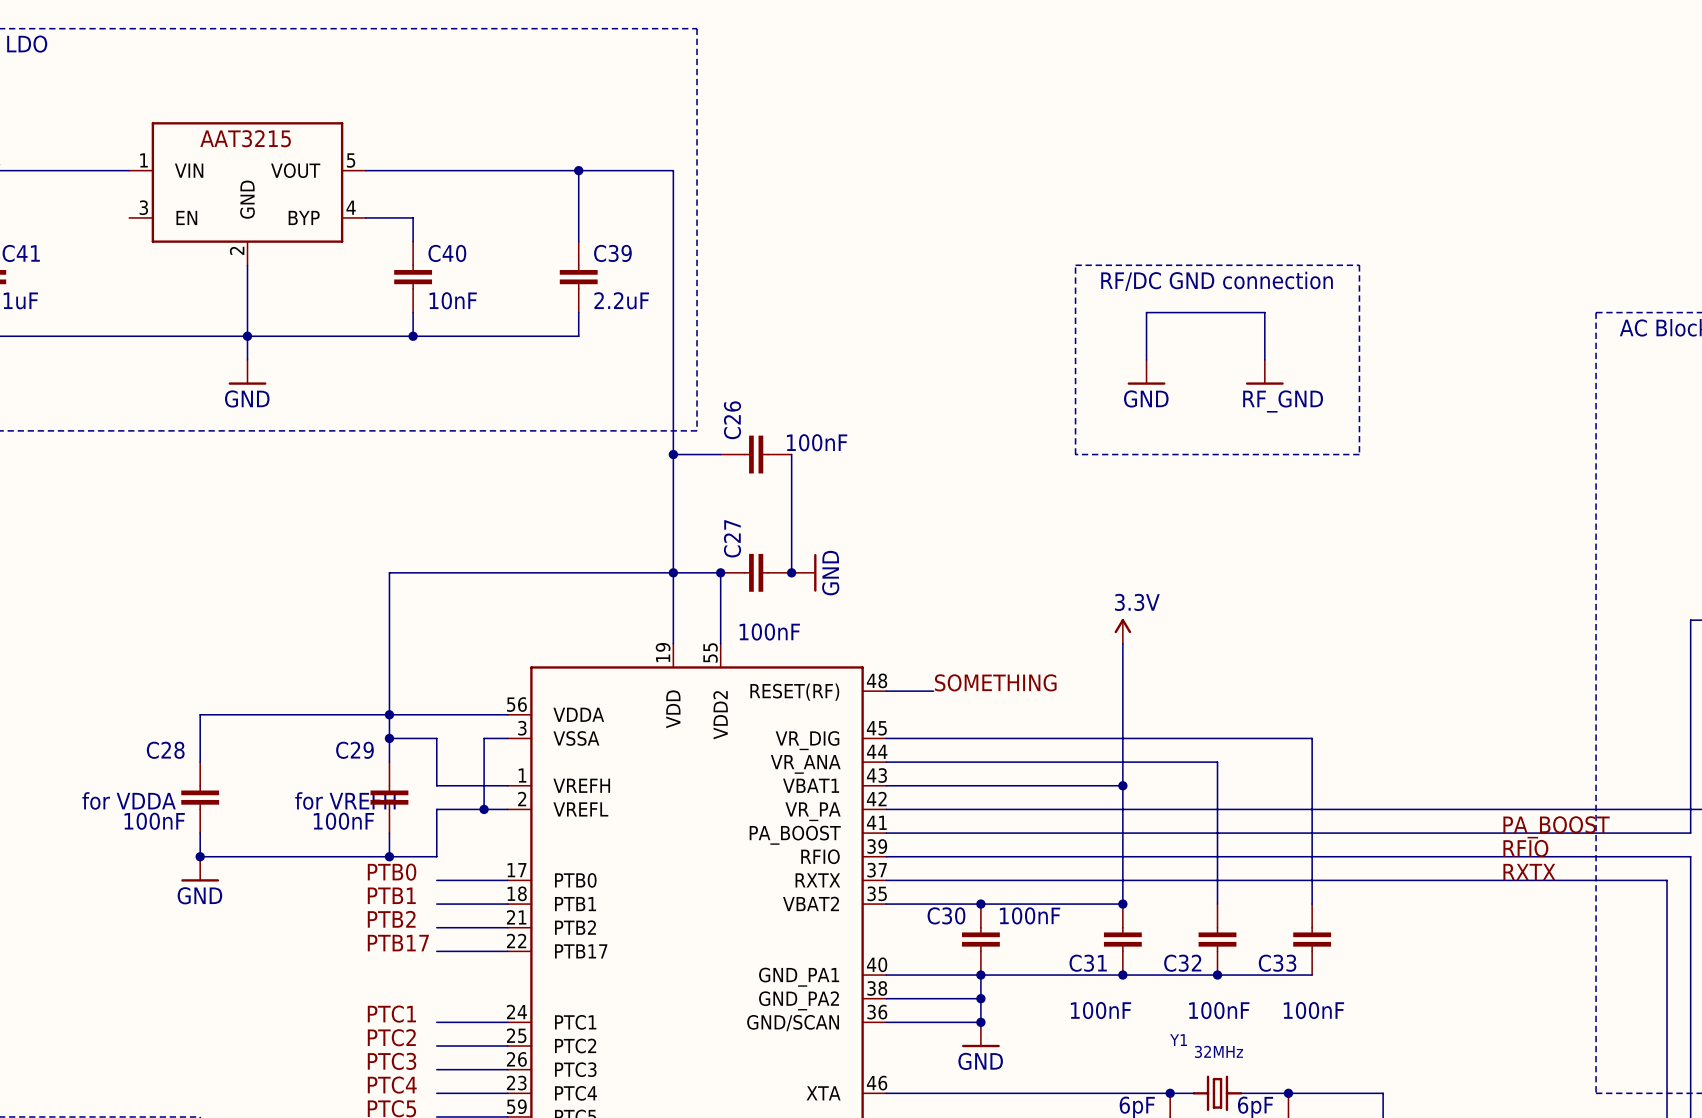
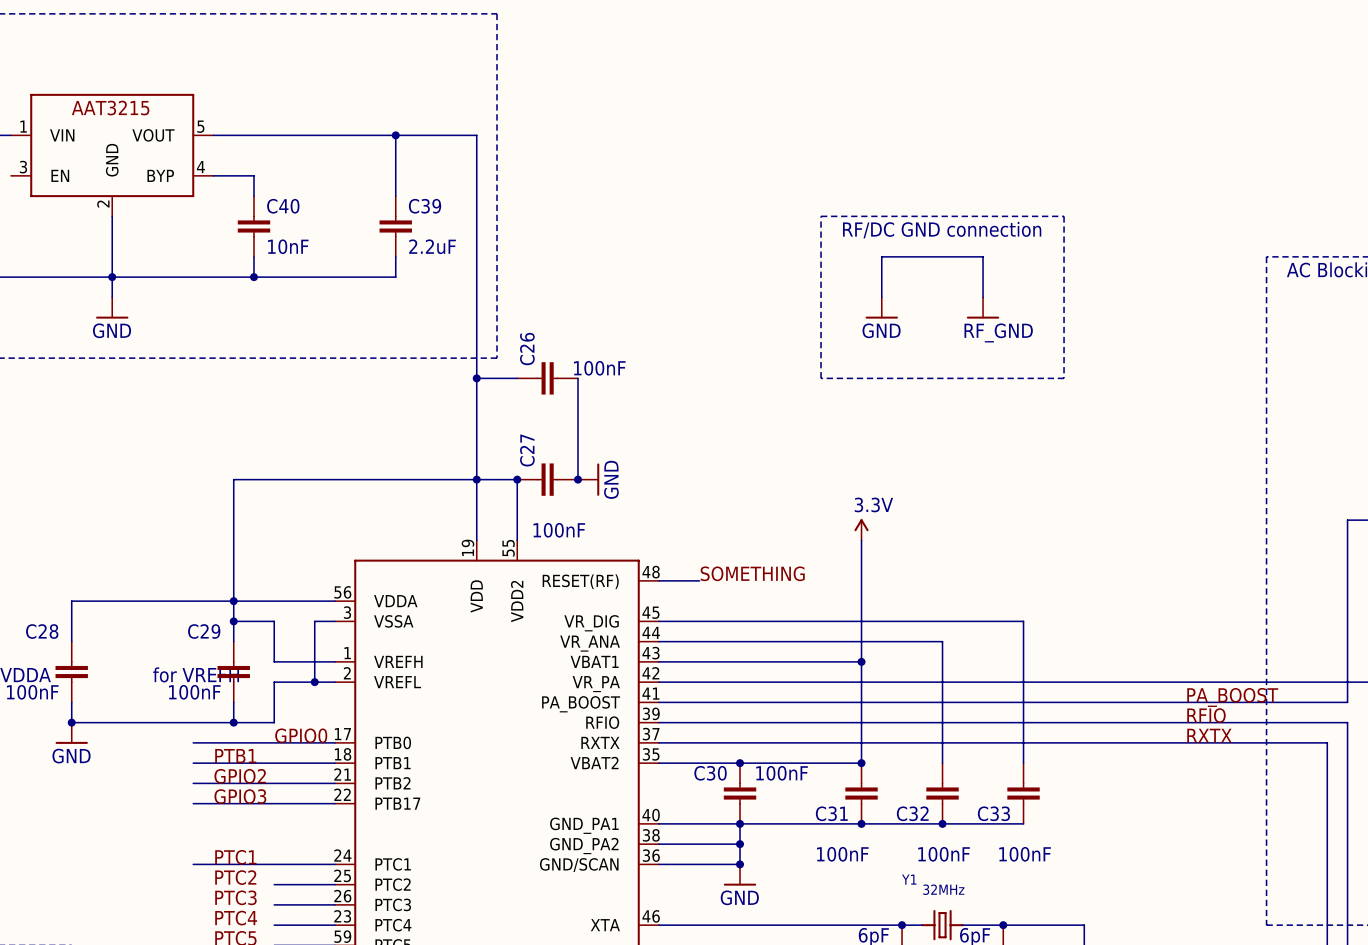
label: PTB0 (392, 872) -> none
label: none -> GPIO0 (301, 735)
wire: none -> (193, 742) (274, 742)
wire: none -> (193, 763) (274, 763)
label: PTB2 (391, 919) -> GPIO2 (240, 776)
wire: none -> (193, 783) (274, 783)
label: PTB17 (398, 943) -> GPIO3 (240, 796)
wire: none -> (193, 803) (274, 803)
wire: none -> (193, 864) (274, 864)

